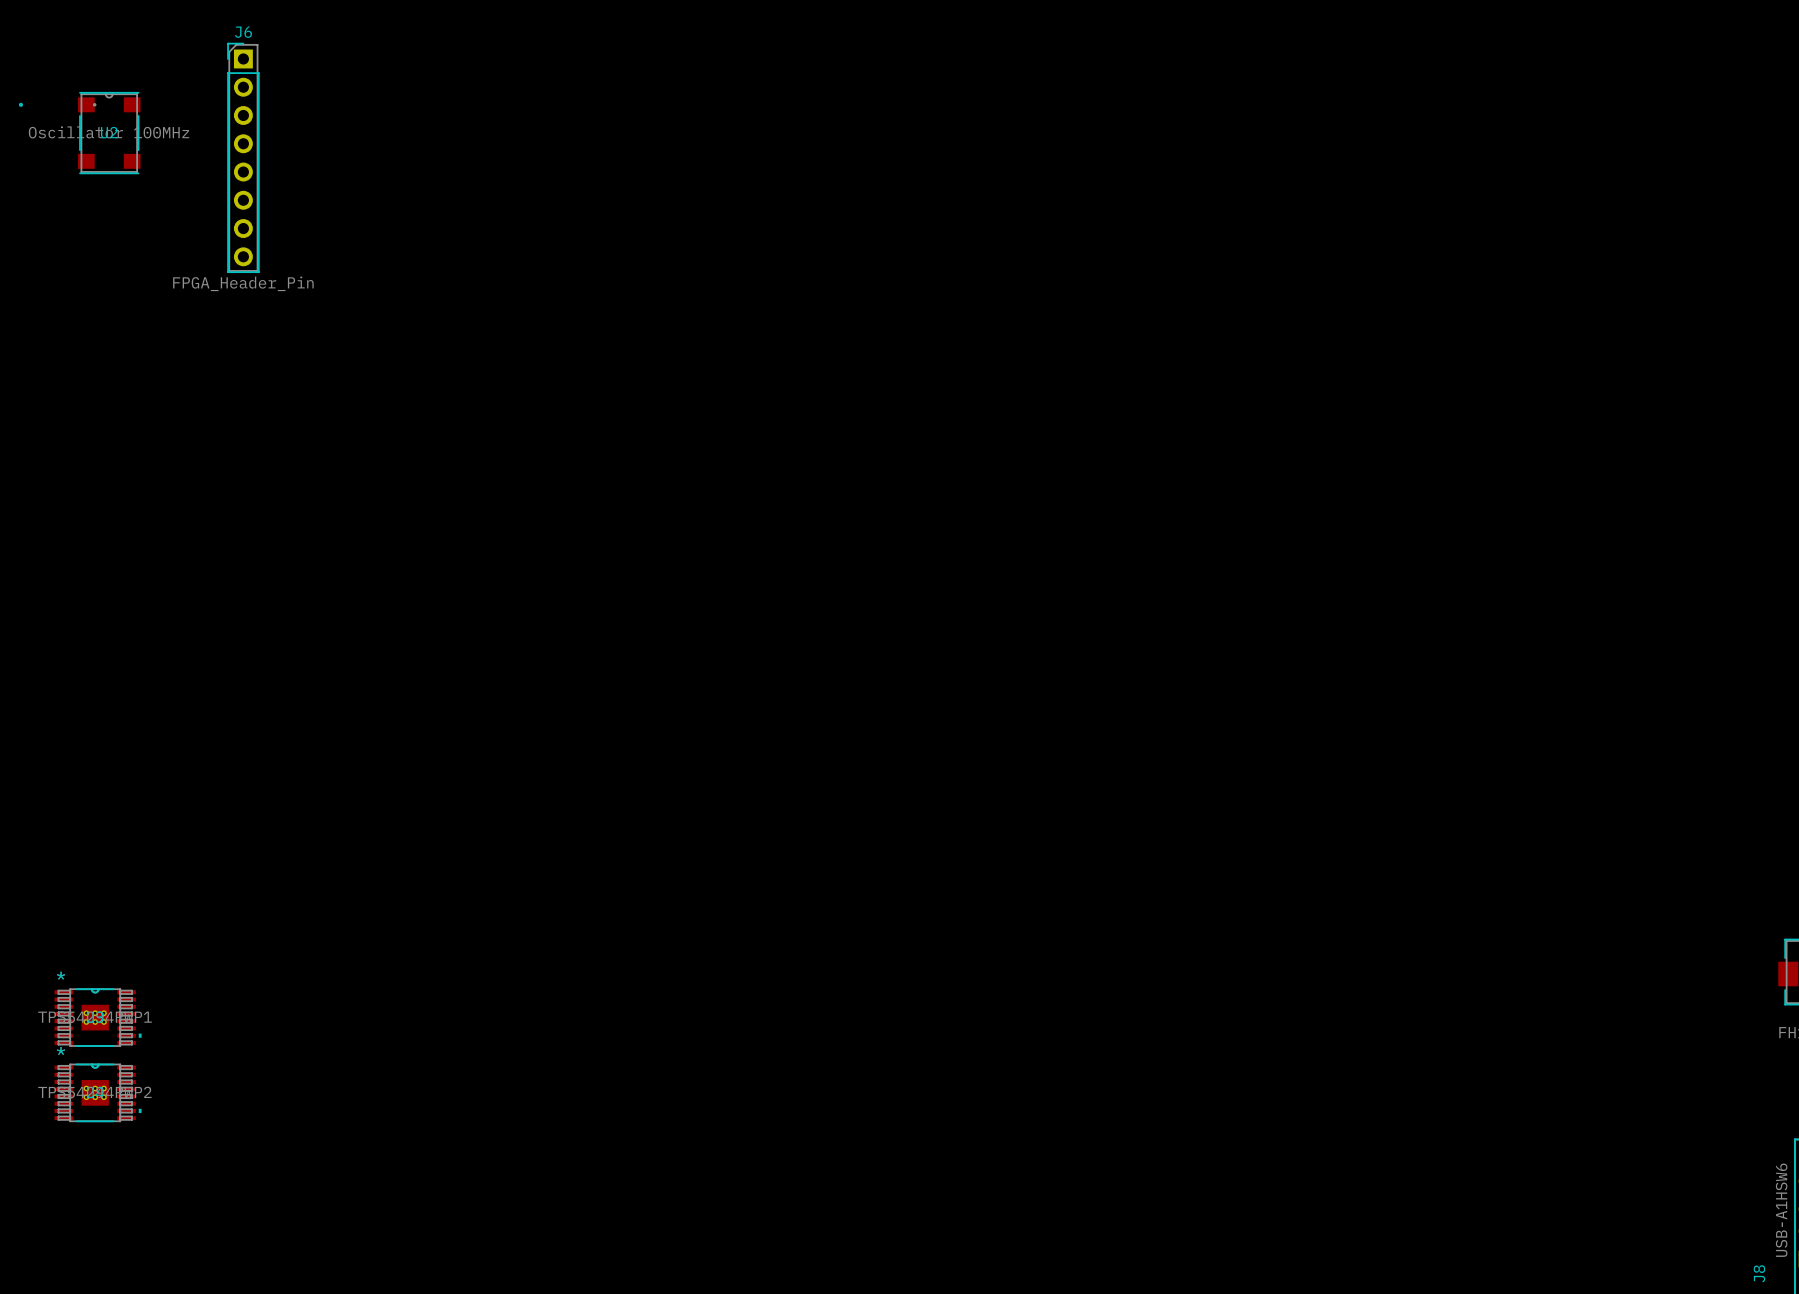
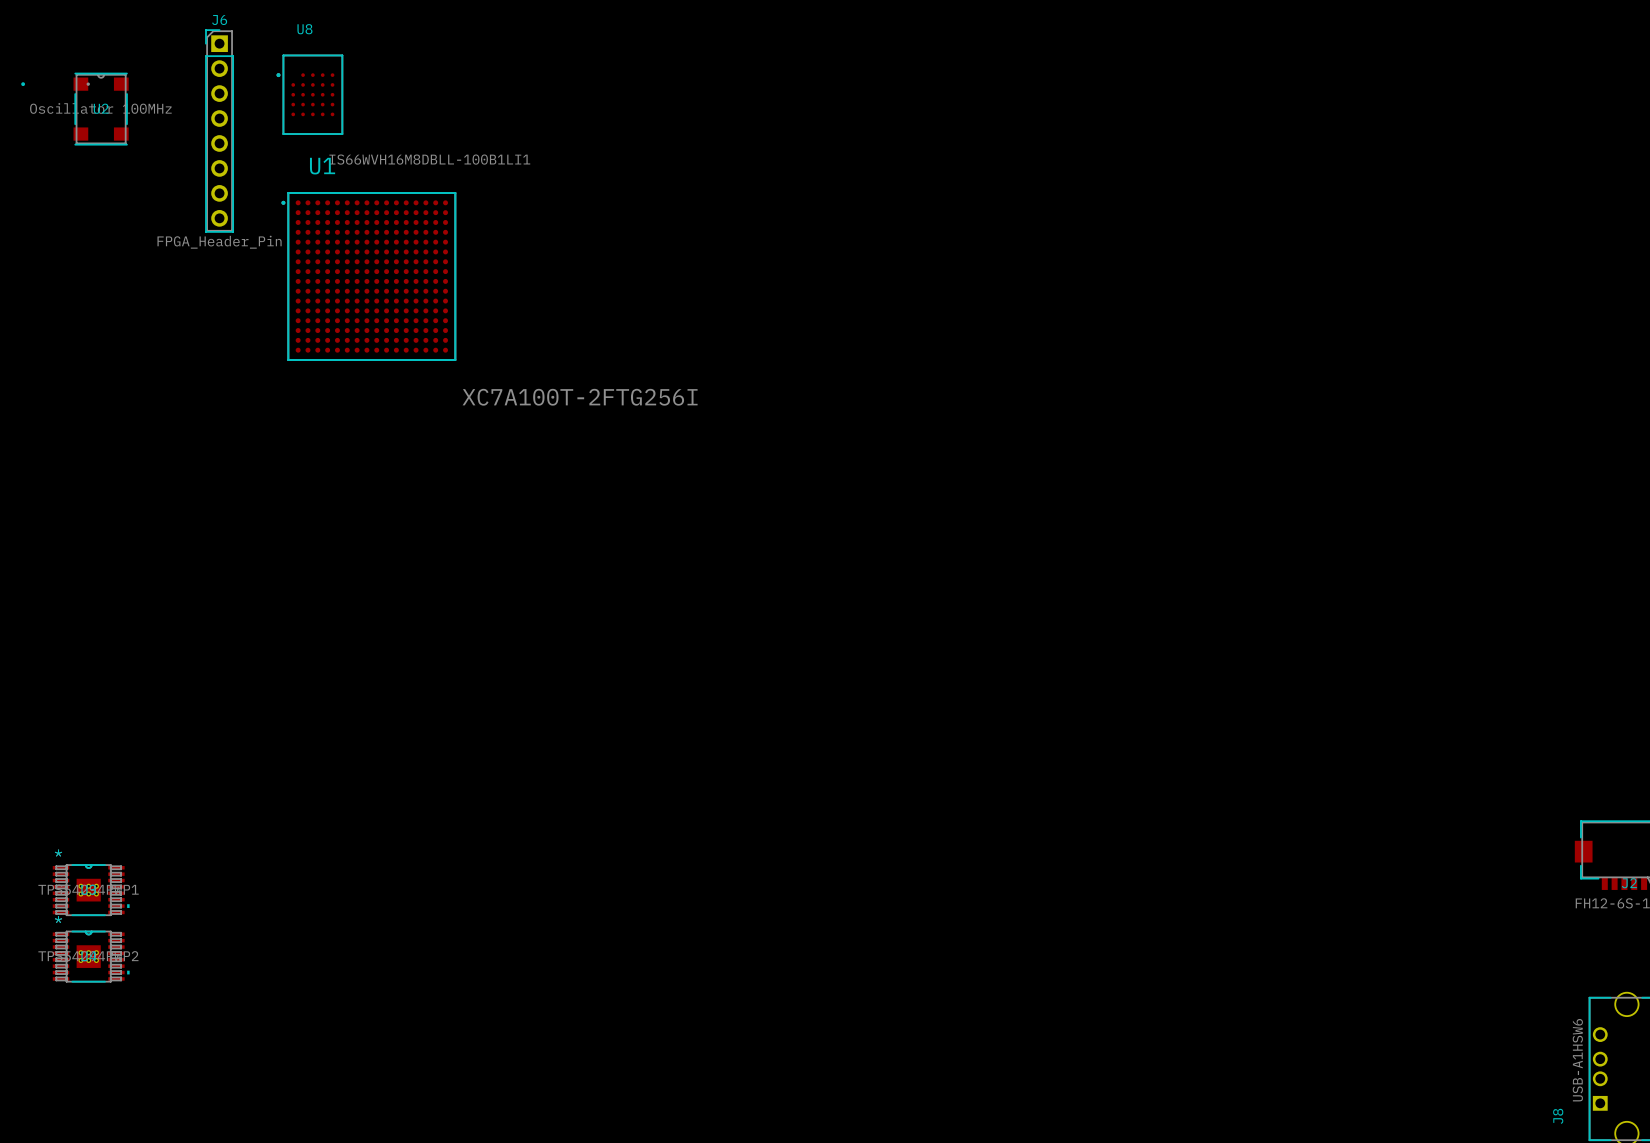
U8: none -> IS66WVH16M8DBLL-100B1LI1 (309, 94)
U1: none -> XC7A100T-2FTG256I (368, 276)

